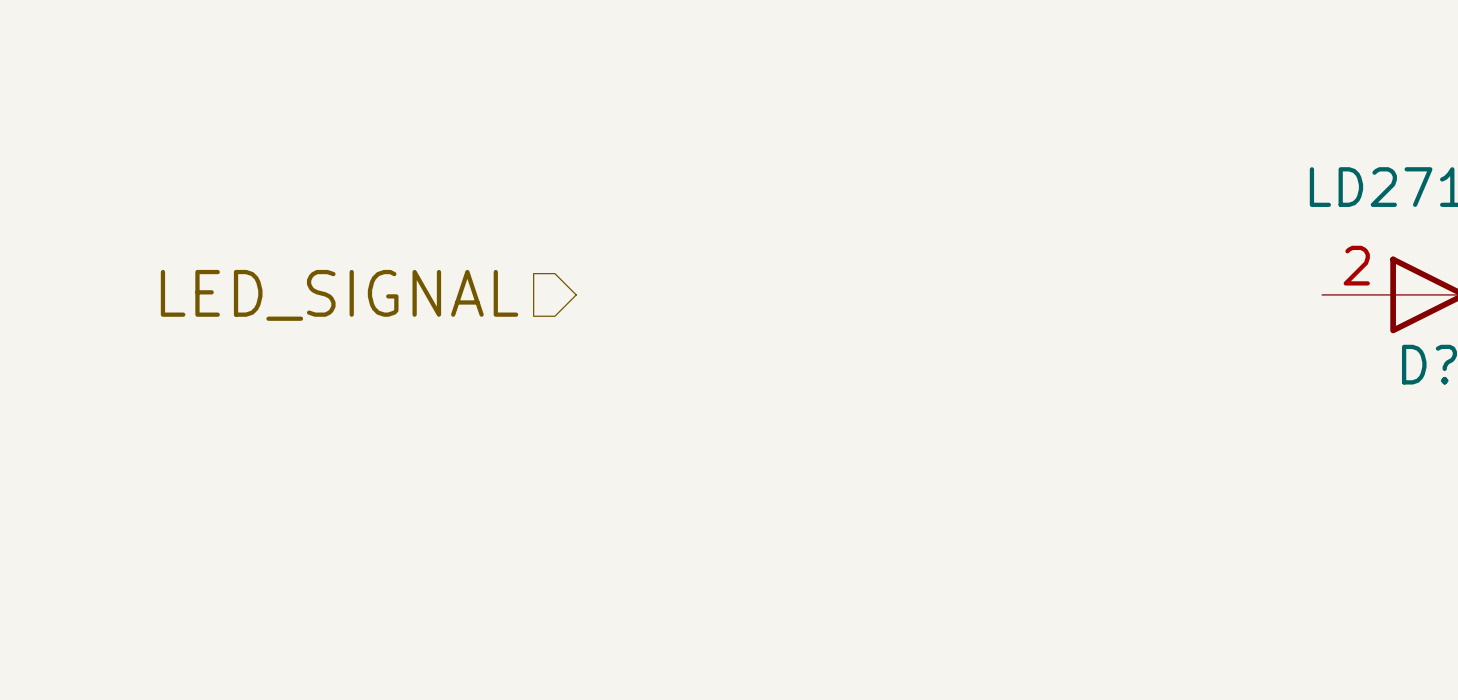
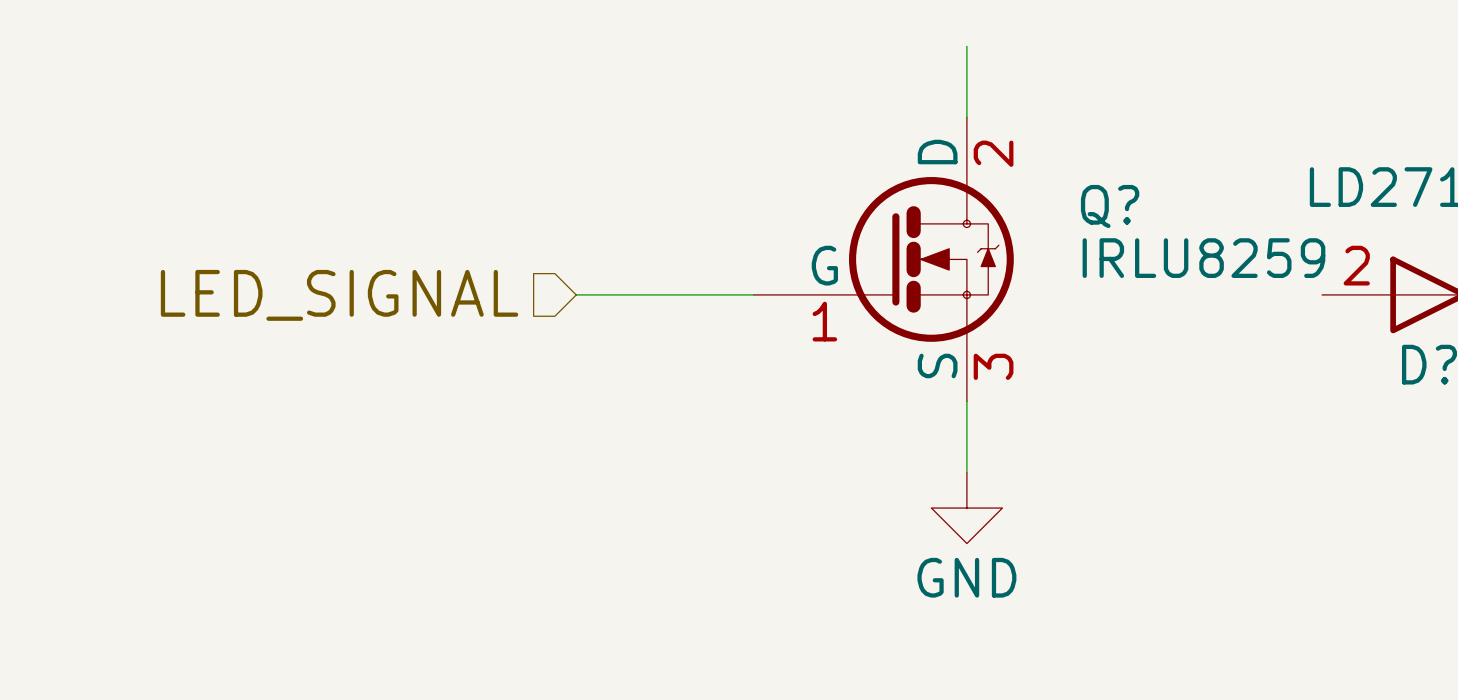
wire: none -> (966, 46) (966, 117)
Q?: none -> IRLU8259 (883, 259)
wire: none -> (576, 294) (753, 294)
wire: none -> (966, 401) (966, 472)
power symbol: none -> GND (966, 508)

